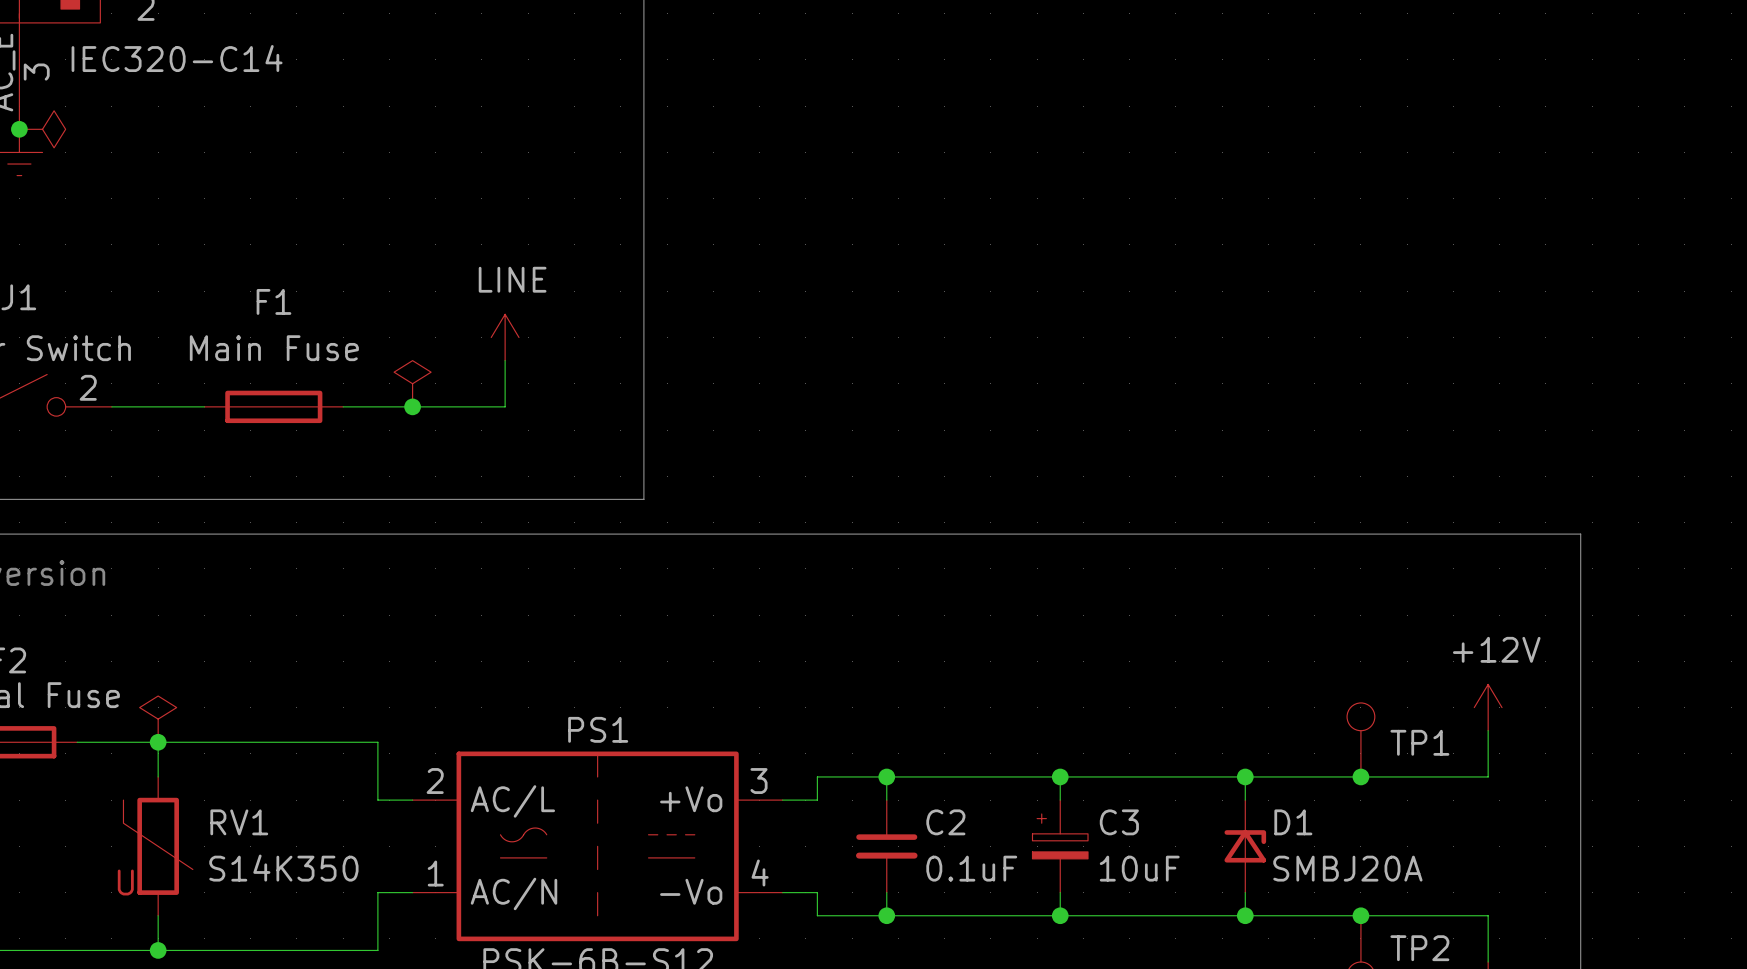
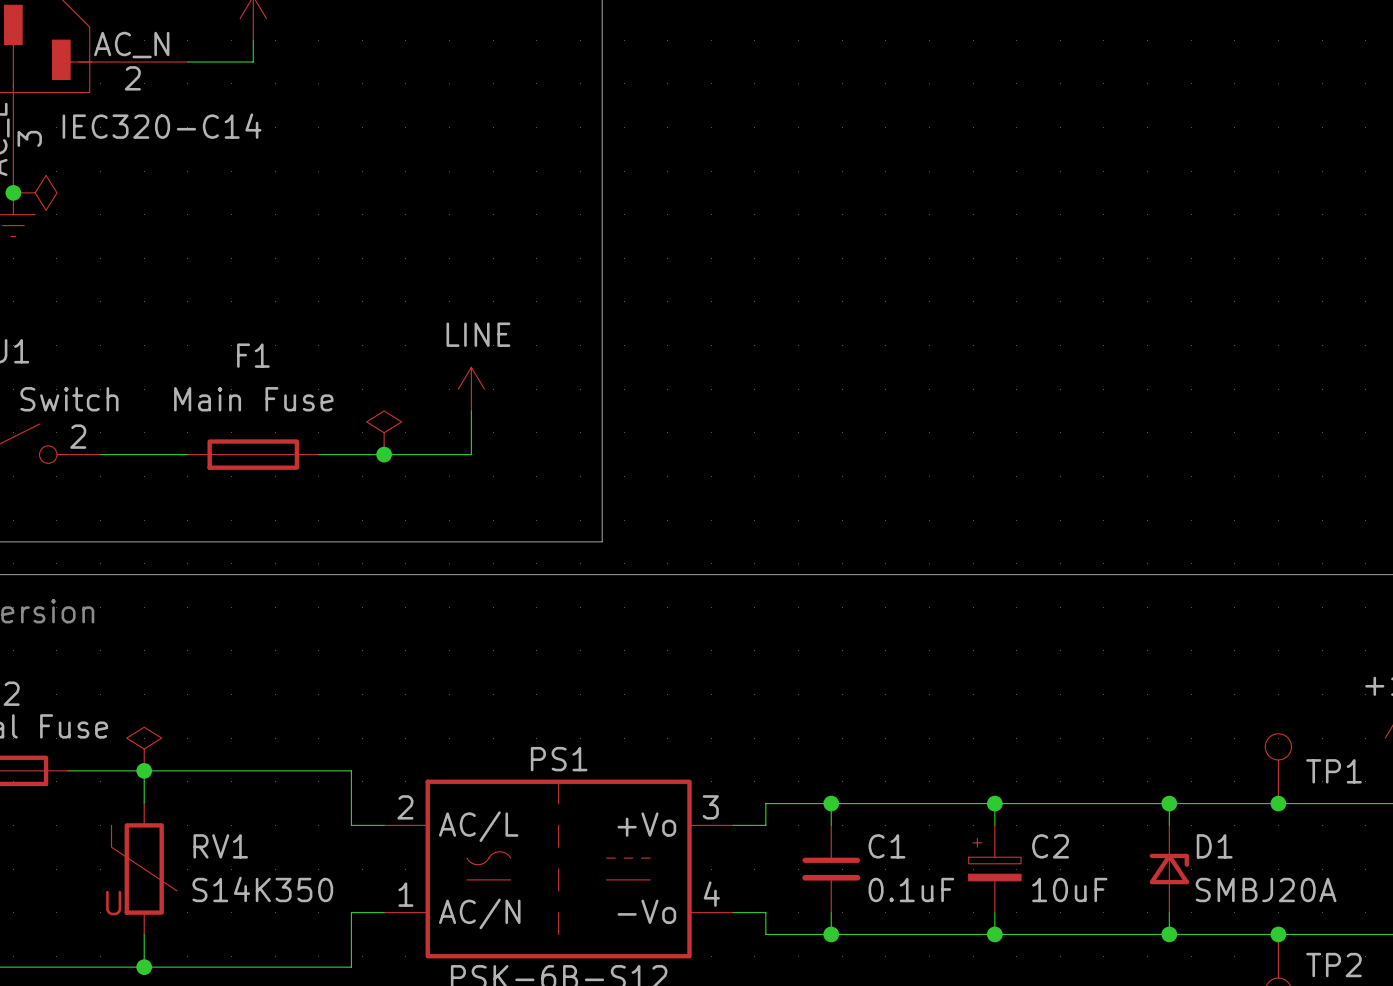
C2 name: C2 (945, 822) -> C1 (886, 846)
C3 name: C3 (1119, 822) -> C2 (1050, 846)

